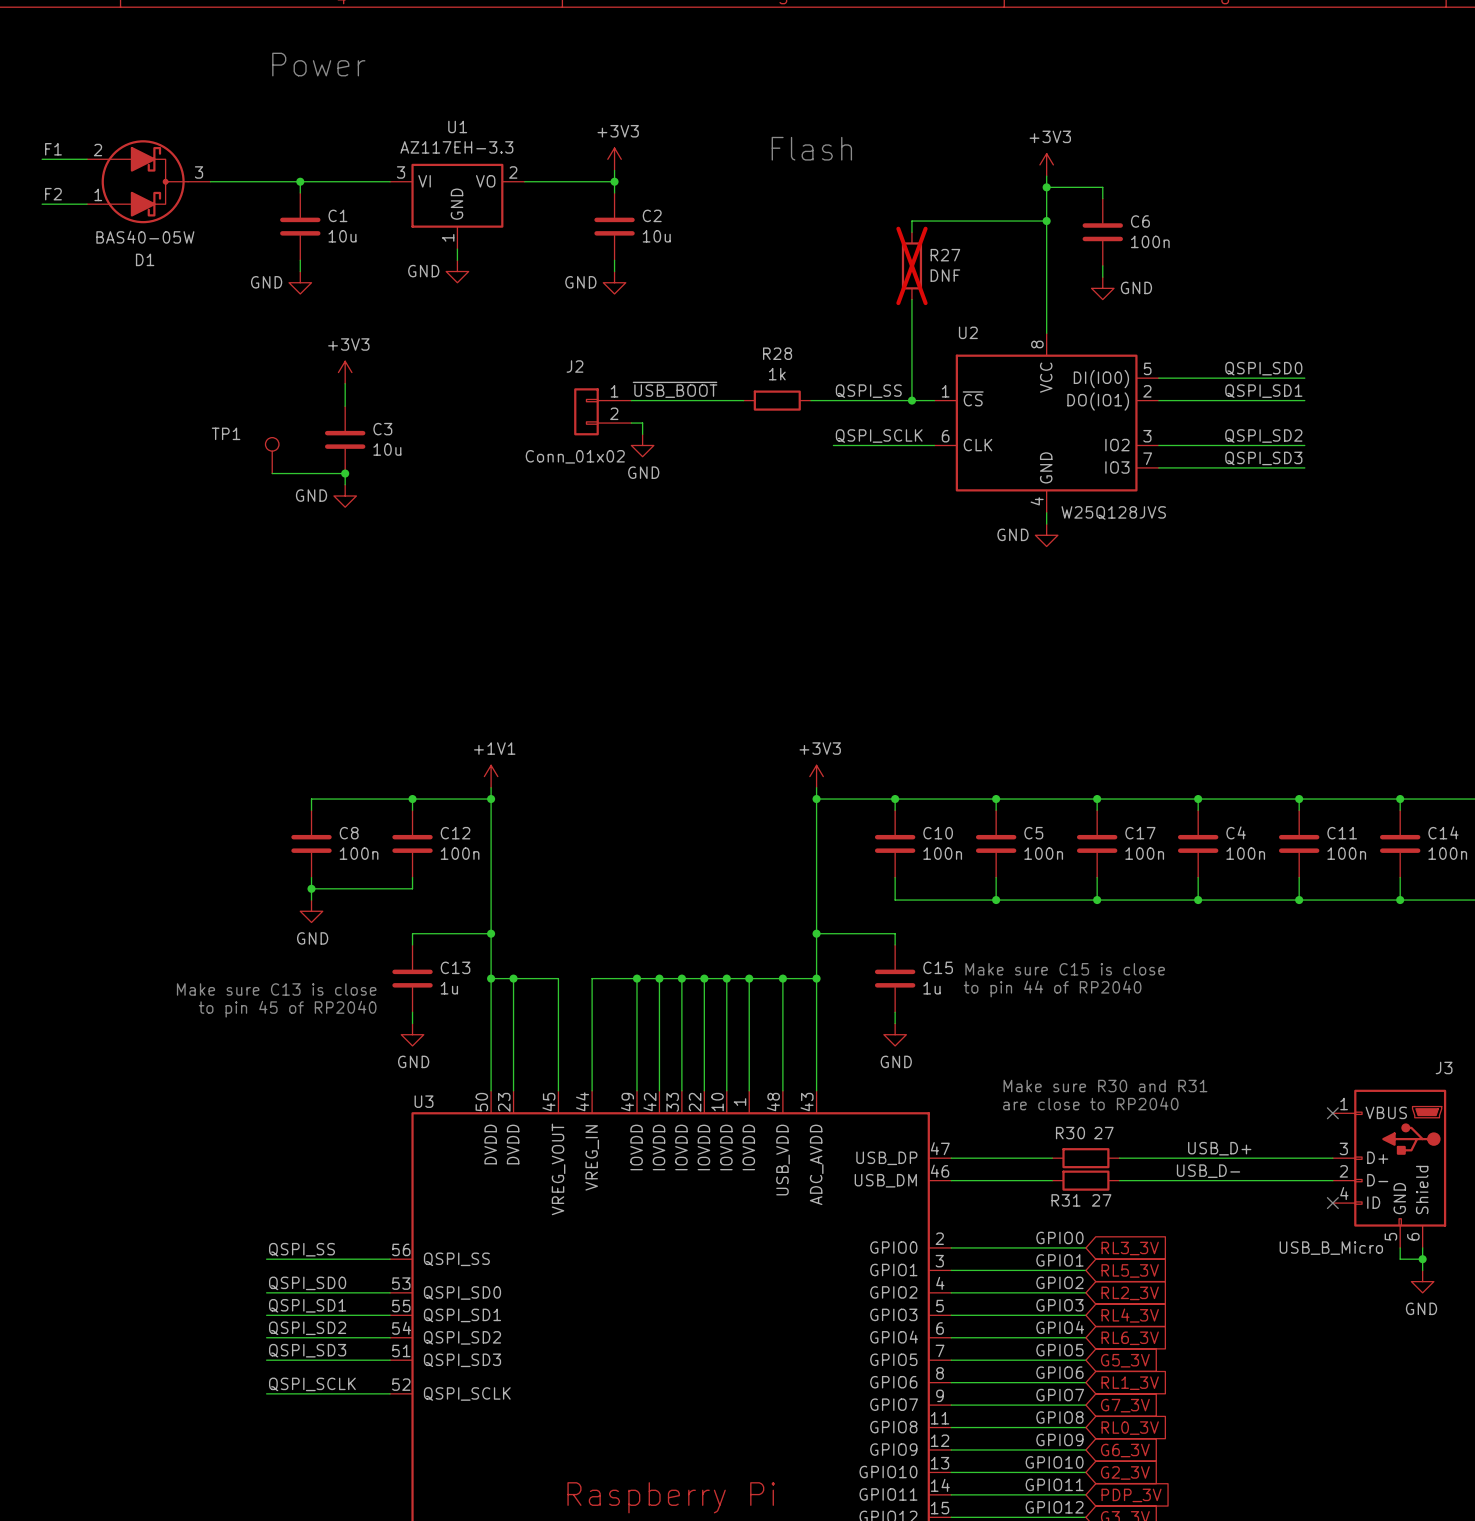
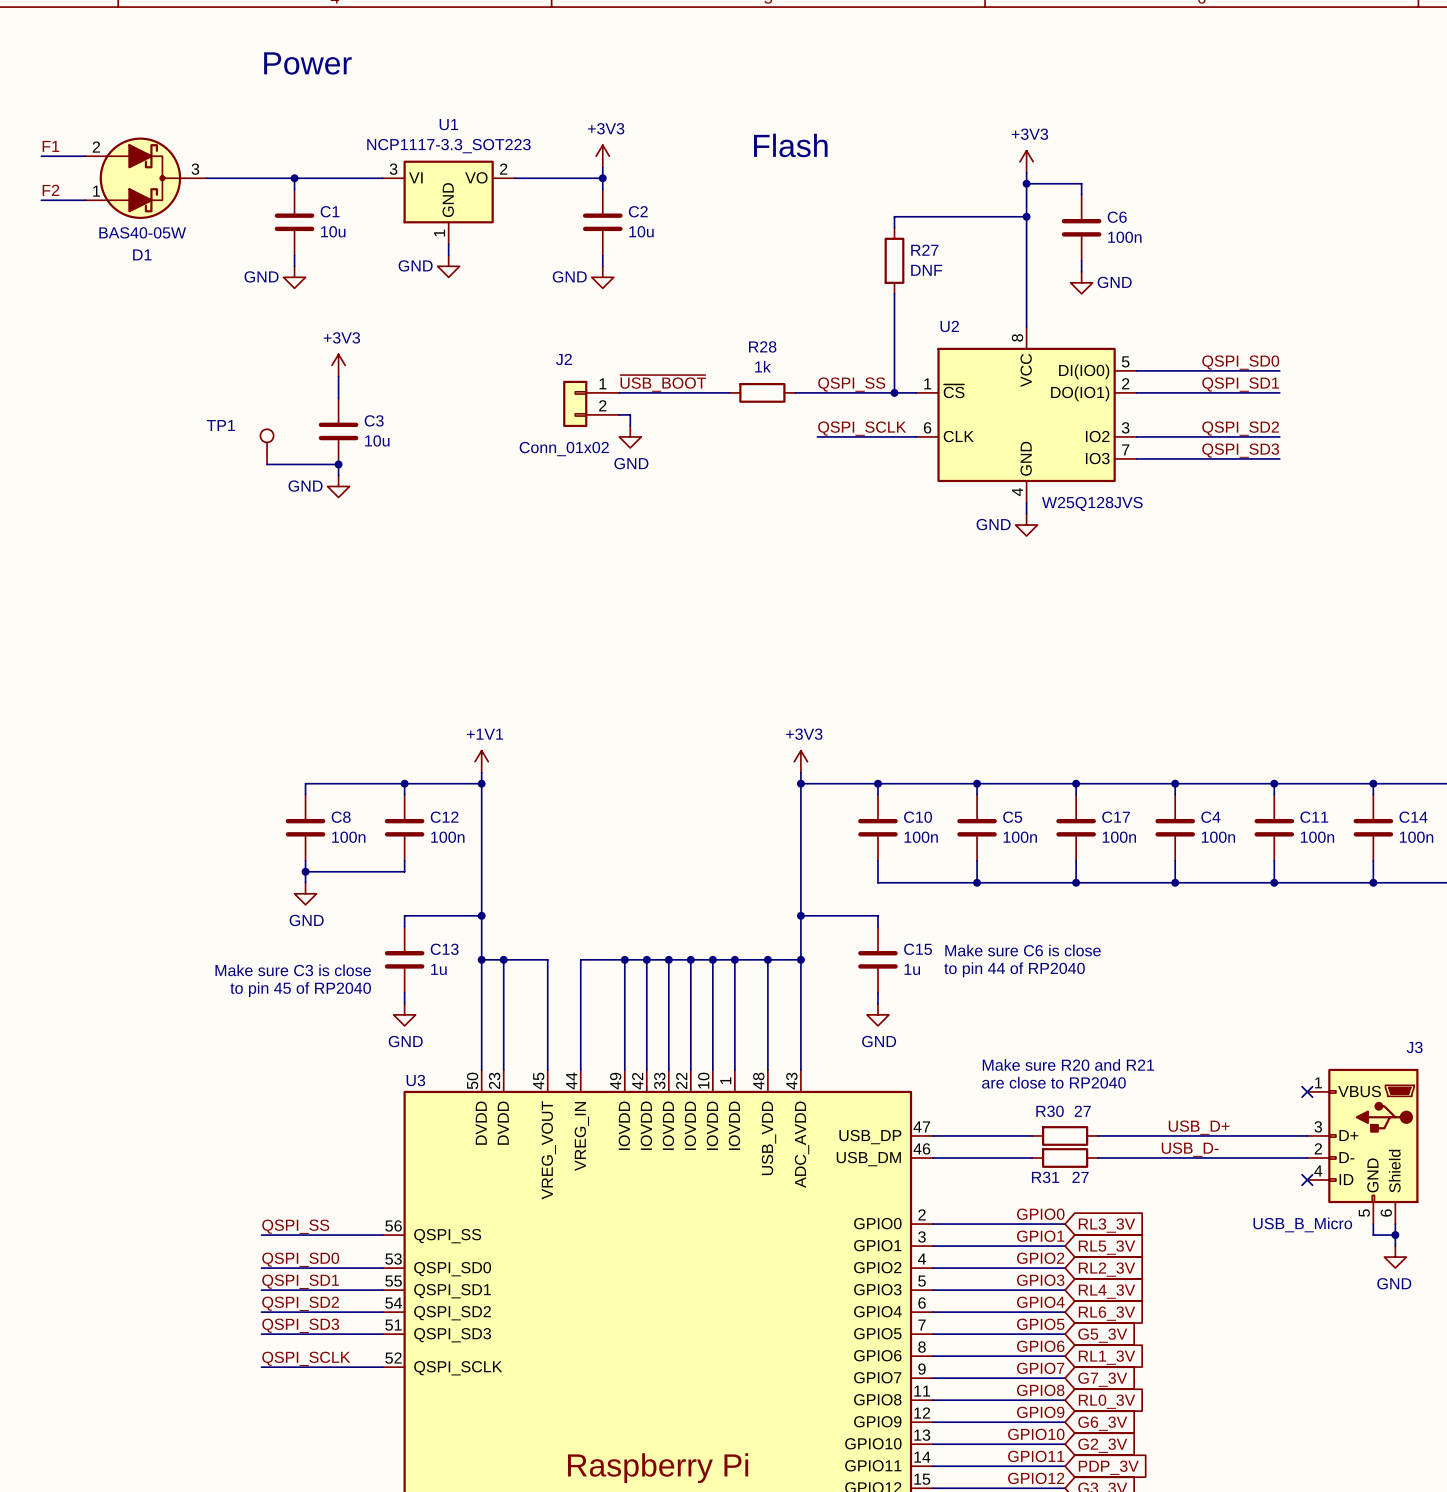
U1 value: AZ117EH-3.3 (456, 147) -> NCP1117-3.3_SOT223 (448, 146)
R27 do-not-place cross: (911, 265) -> none
text: Make sure C15 is close (1065, 969) -> Make sure C6 is close (1023, 950)
text: Make sure C13 is close (276, 989) -> Make sure C3 is close (293, 970)
text: Make sure R30 and R31 (1105, 1086) -> Make sure R20 and R21 (1068, 1064)

